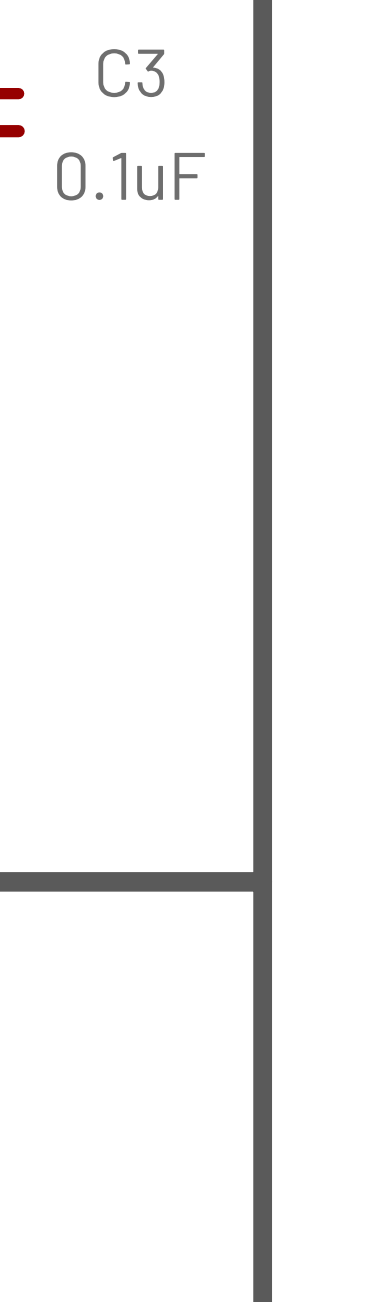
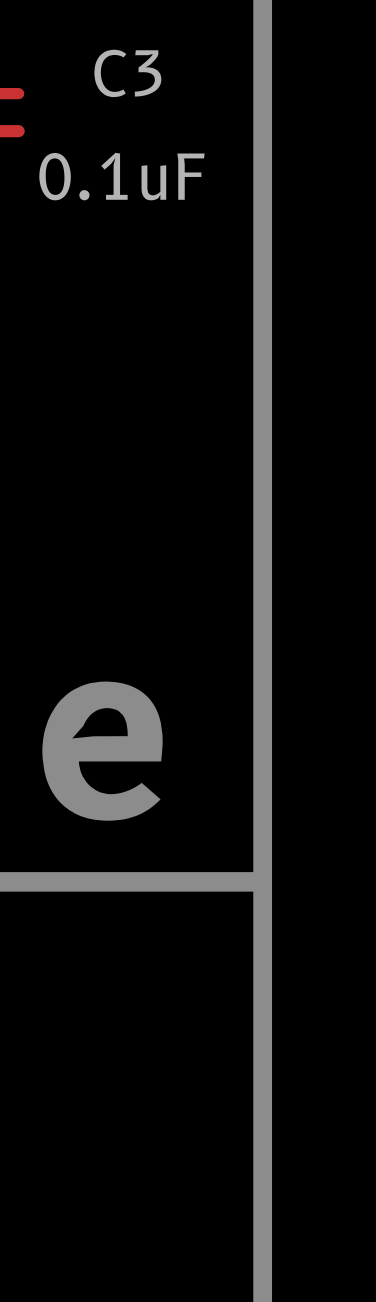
text: none -> e (102, 751)

